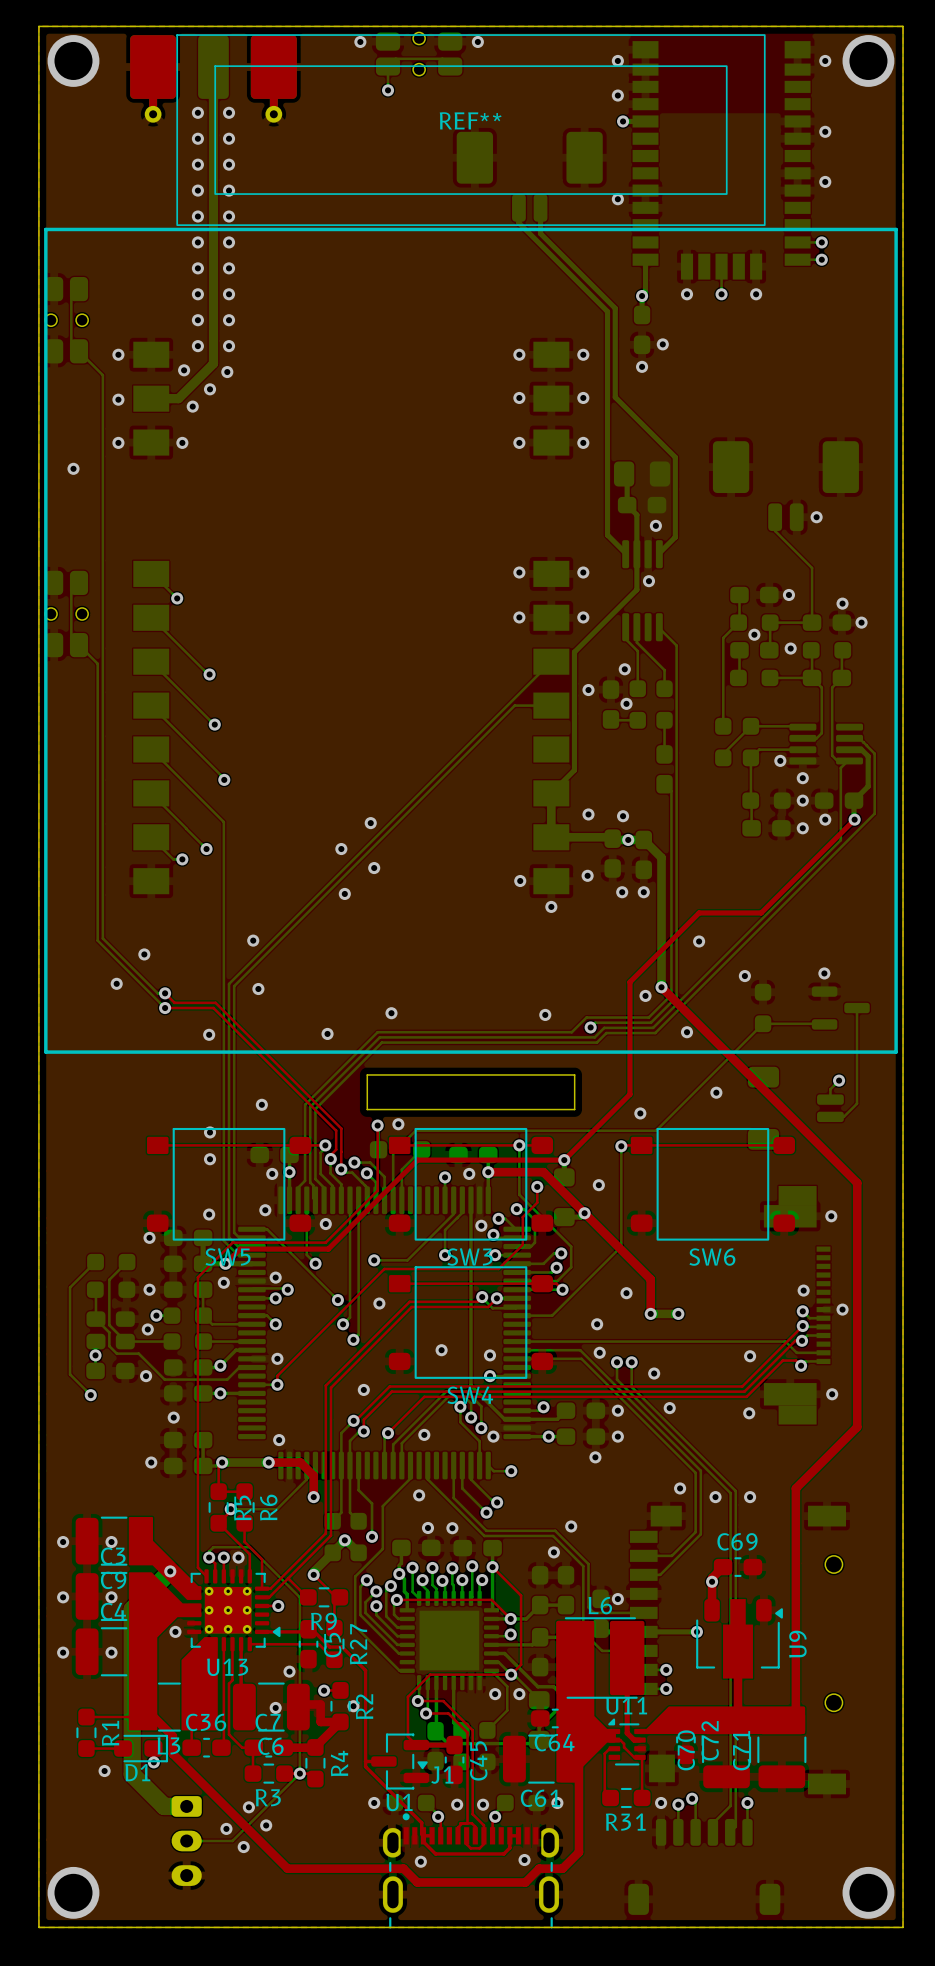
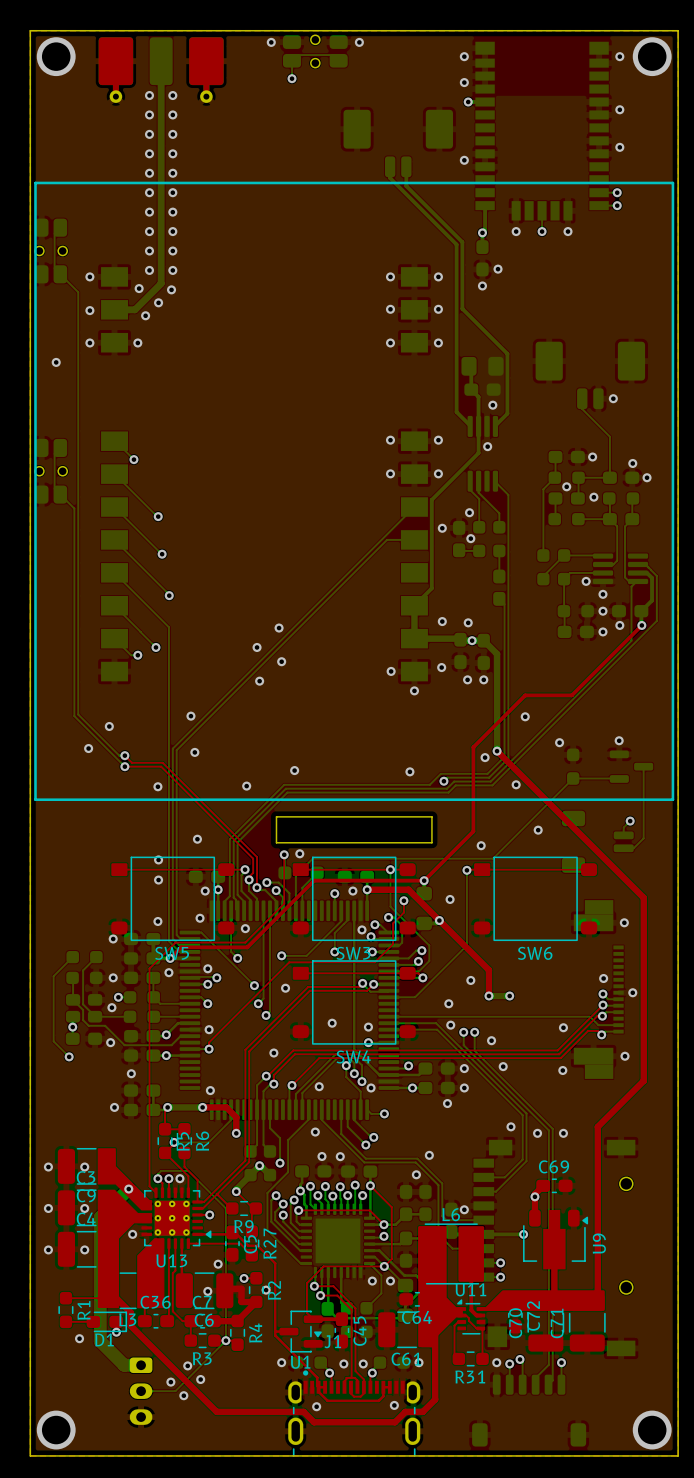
REF**: (470, 130) -> none

